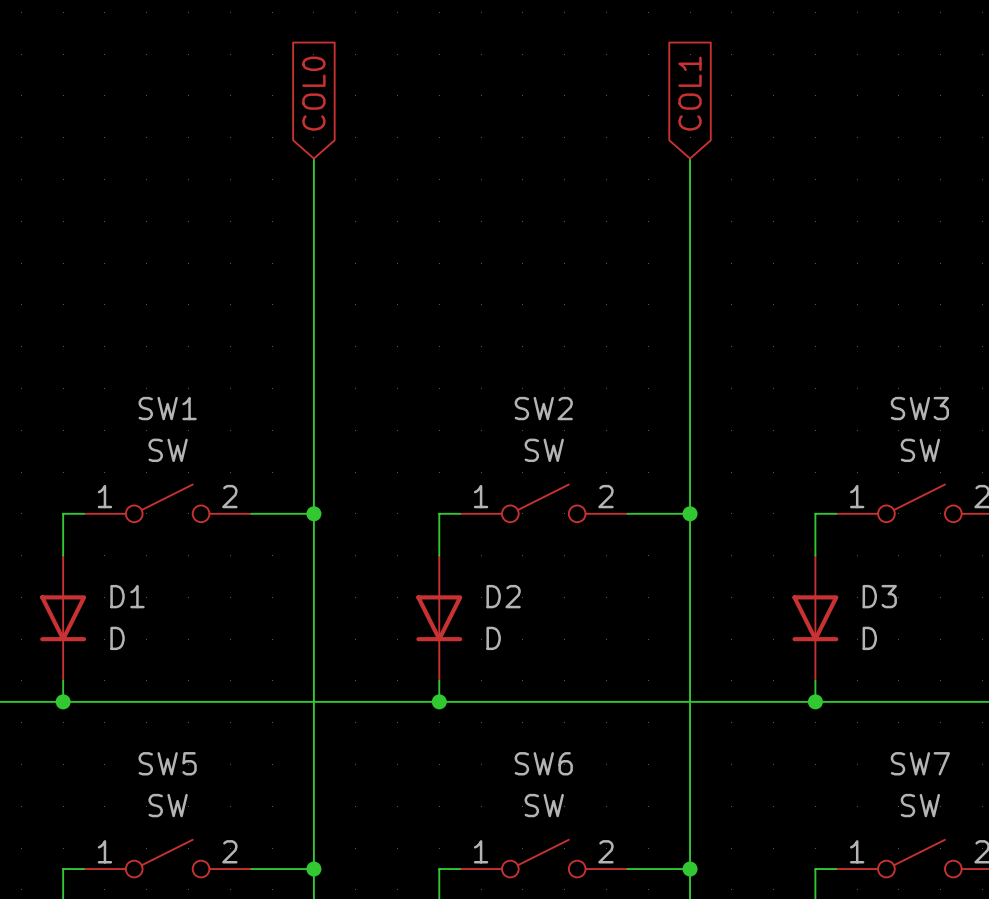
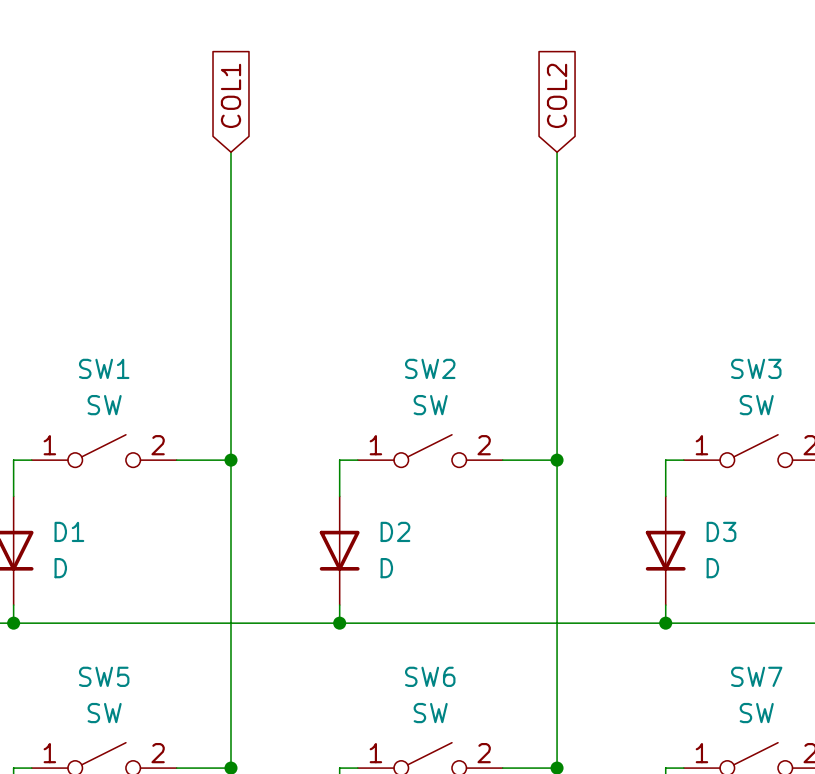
global label: COL0 (313, 93) -> COL1 (230, 95)
global label: COL1 (690, 93) -> COL2 (557, 95)

